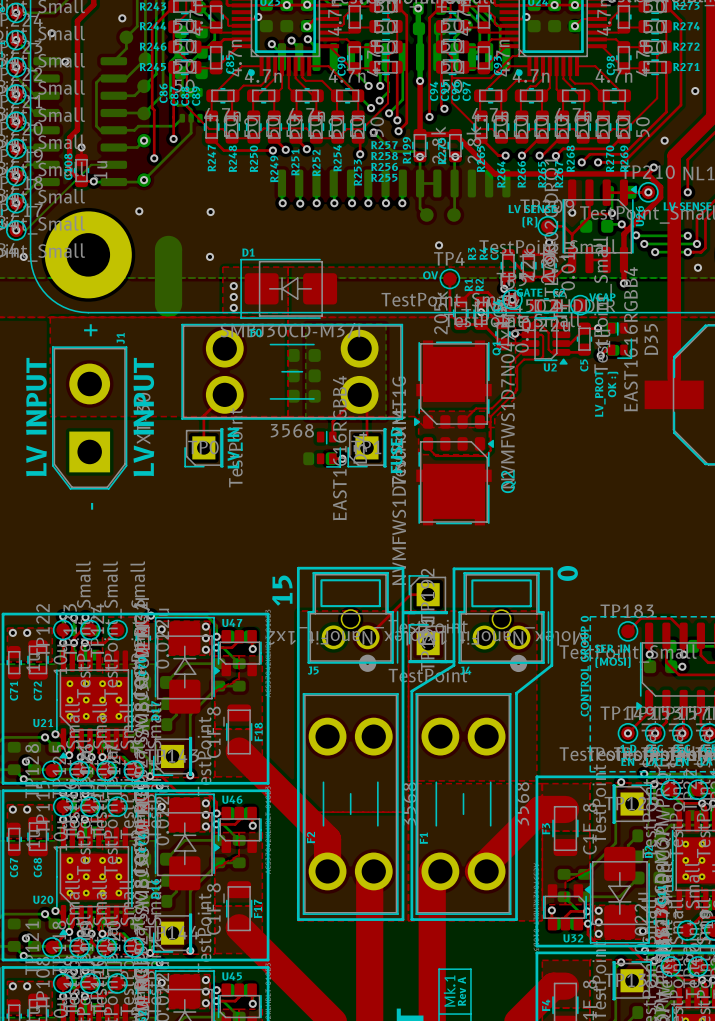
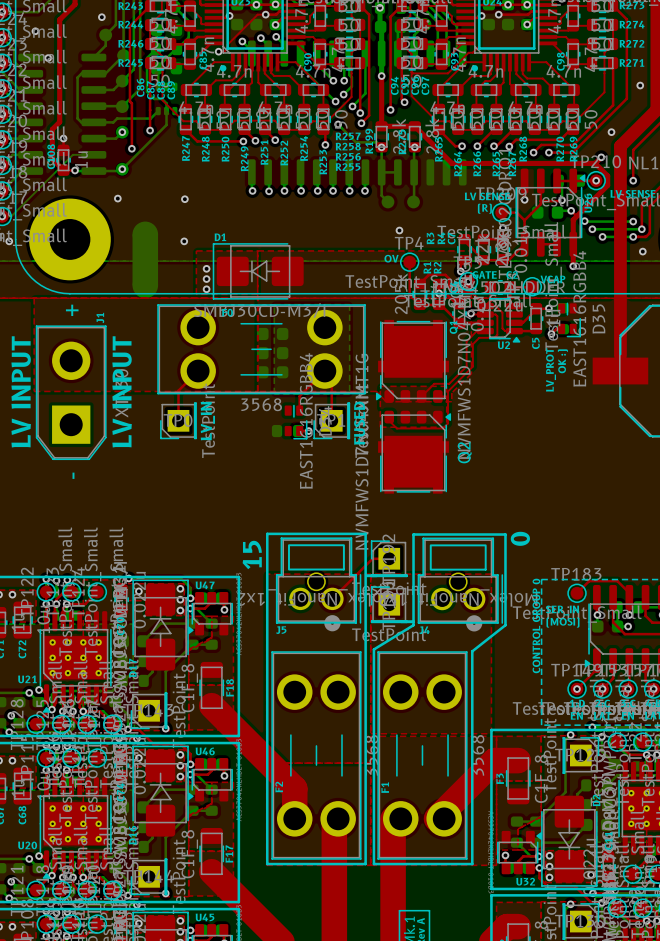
top track: none -> (296, 11) (279, 11) (276, 14) (257, 14) (227, 45) (224, 51) (218, 51)
top track: none -> (547, 11) (531, 11) (528, 14) (498, 14)
via: none -> (265, 14)
via: none -> (498, 14)
via: none -> (218, 51)

